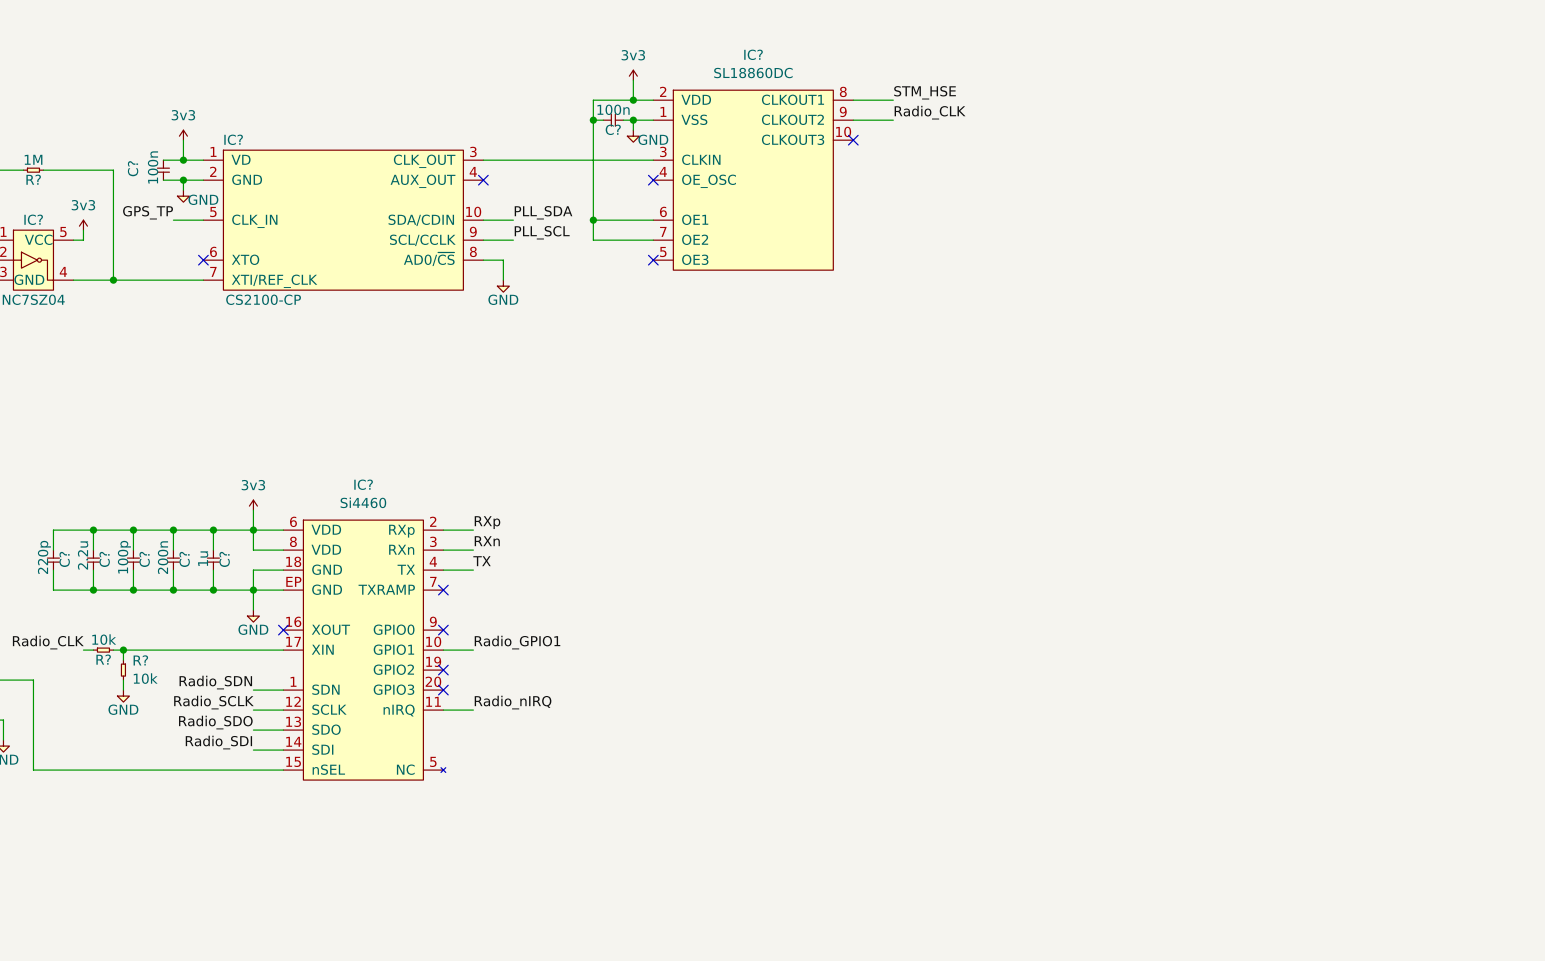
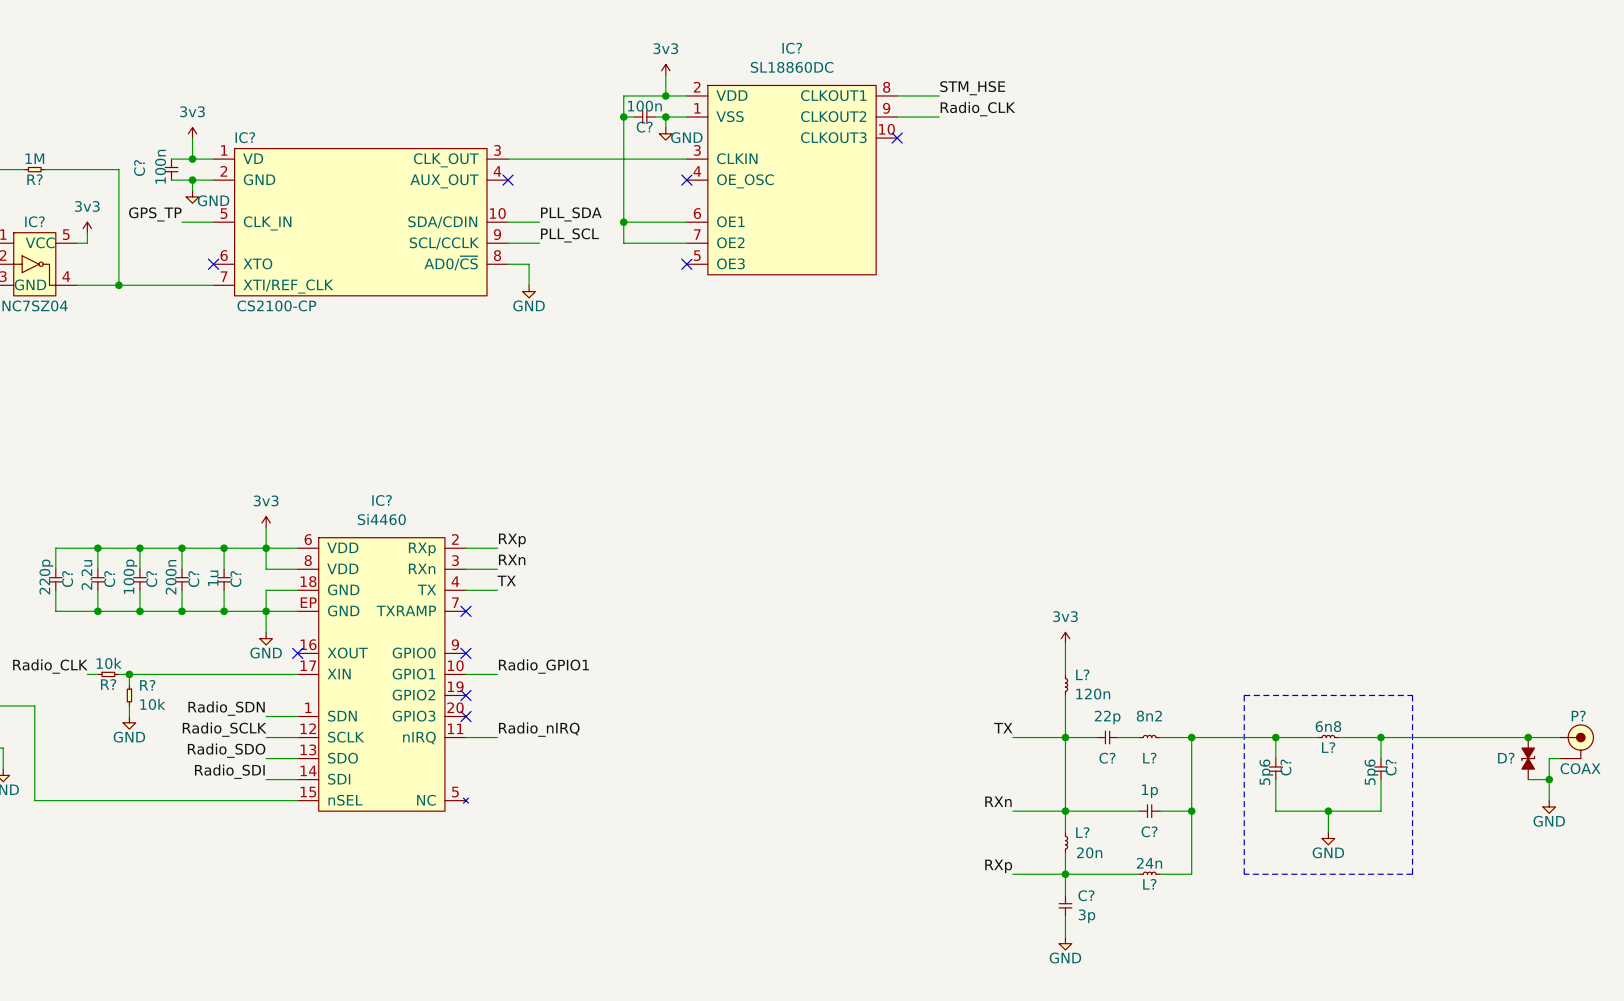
power symbol: none -> 3v3 (1065, 637)
wire: none -> (1065, 642) (1065, 674)
L?: none -> 120n (1066, 684)
wire: none -> (1065, 695) (1065, 832)
line: none -> (1244, 695) (1412, 695) (1412, 874) (1244, 874) (1244, 695)
label: none -> TX (1003, 728)
L?: none -> 8n2 (1149, 736)
L?: none -> 6n8 (1328, 736)
wire: none -> (1012, 737) (1097, 737)
junction: none -> (1065, 737)
C?: none -> 22p (1107, 737)
wire: none -> (1118, 737) (1139, 737)
wire: none -> (1160, 737) (1317, 737)
wire: none -> (1191, 737) (1191, 874) (1160, 874)
junction: none -> (1191, 737)
wire: none -> (1275, 737) (1275, 758)
junction: none -> (1275, 737)
wire: none -> (1338, 737) (1559, 737)
wire: none -> (1380, 737) (1380, 758)
junction: none -> (1380, 737)
junction: none -> (1528, 737)
P?: none -> COAX (1576, 741)
D?: none -> (1528, 758)
wire: none -> (1559, 758) (1549, 758) (1549, 800)
C?: none -> 5p6 (1275, 769)
C?: none -> 5p6 (1380, 769)
wire: none -> (1275, 779) (1275, 811) (1380, 811) (1380, 779)
wire: none -> (1528, 779) (1549, 779)
junction: none -> (1549, 779)
label: none -> RXn (998, 801)
power symbol: none -> GND (1549, 806)
wire: none -> (1012, 811) (1139, 811)
junction: none -> (1065, 811)
C?: none -> 1p (1149, 811)
wire: none -> (1160, 811) (1191, 811)
junction: none -> (1191, 811)
wire: none -> (1328, 811) (1328, 832)
junction: none -> (1328, 811)
power symbol: none -> GND (1328, 838)
L?: none -> 20n (1066, 842)
wire: none -> (1065, 853) (1065, 895)
label: none -> RXp (998, 866)
L?: none -> 24n (1149, 873)
wire: none -> (1012, 874) (1139, 874)
junction: none -> (1065, 874)
C?: none -> 3p (1065, 905)
wire: none -> (1065, 916) (1065, 937)
power symbol: none -> GND (1065, 943)

